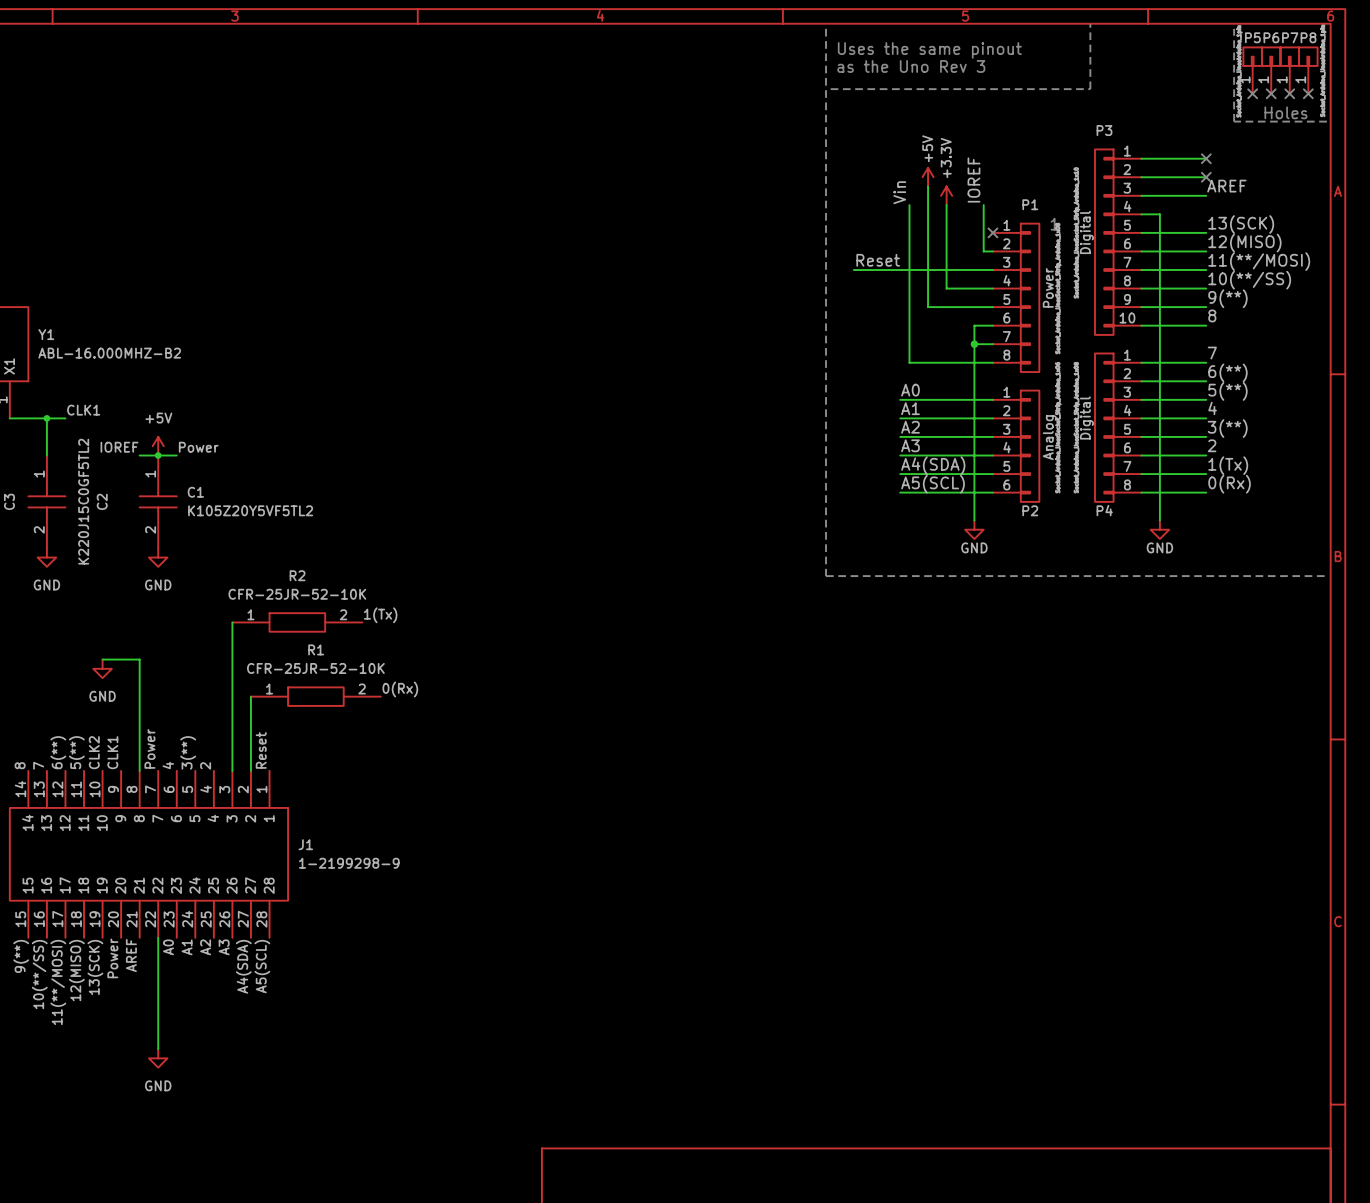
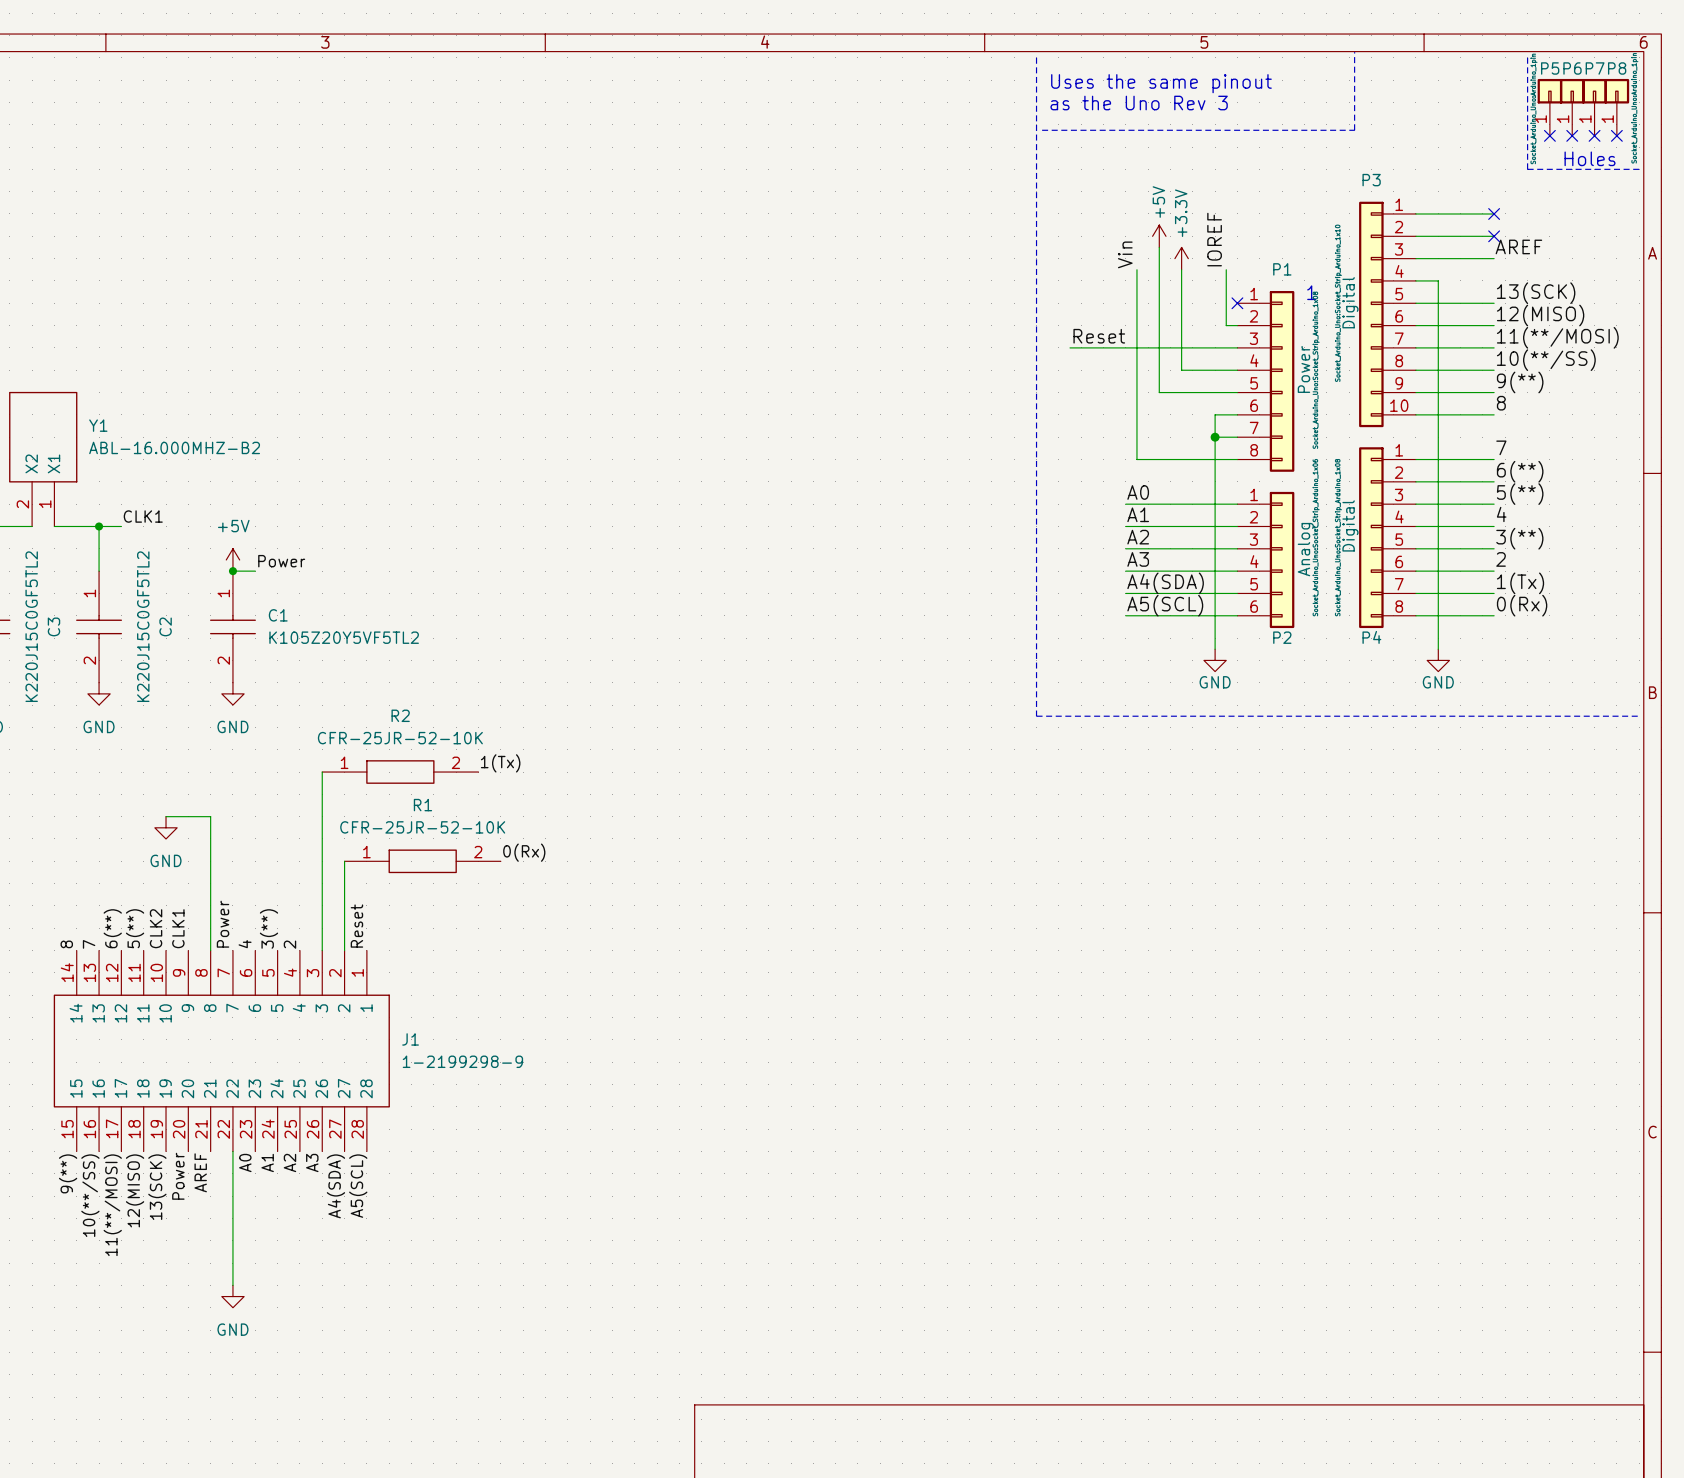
label: IOREF (119, 447) -> none
wire: (139, 455) (158, 455) -> none

